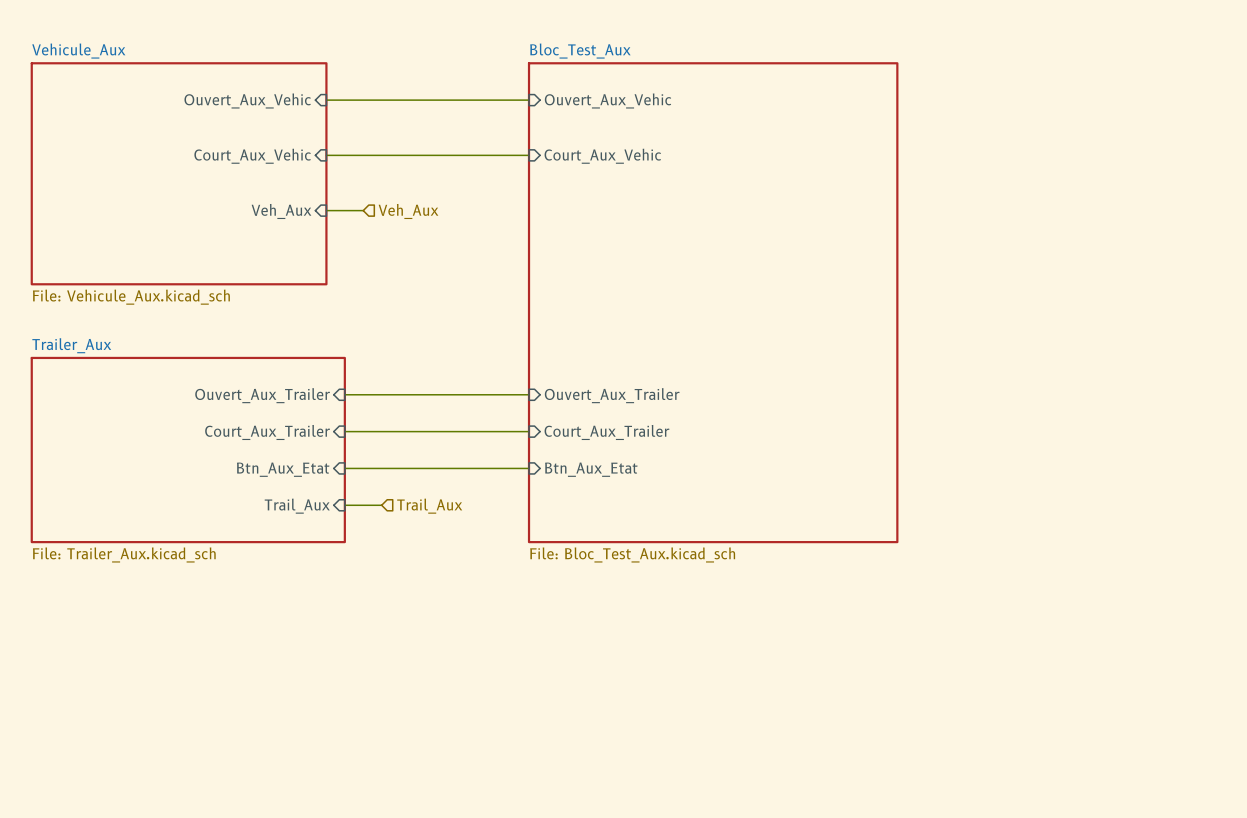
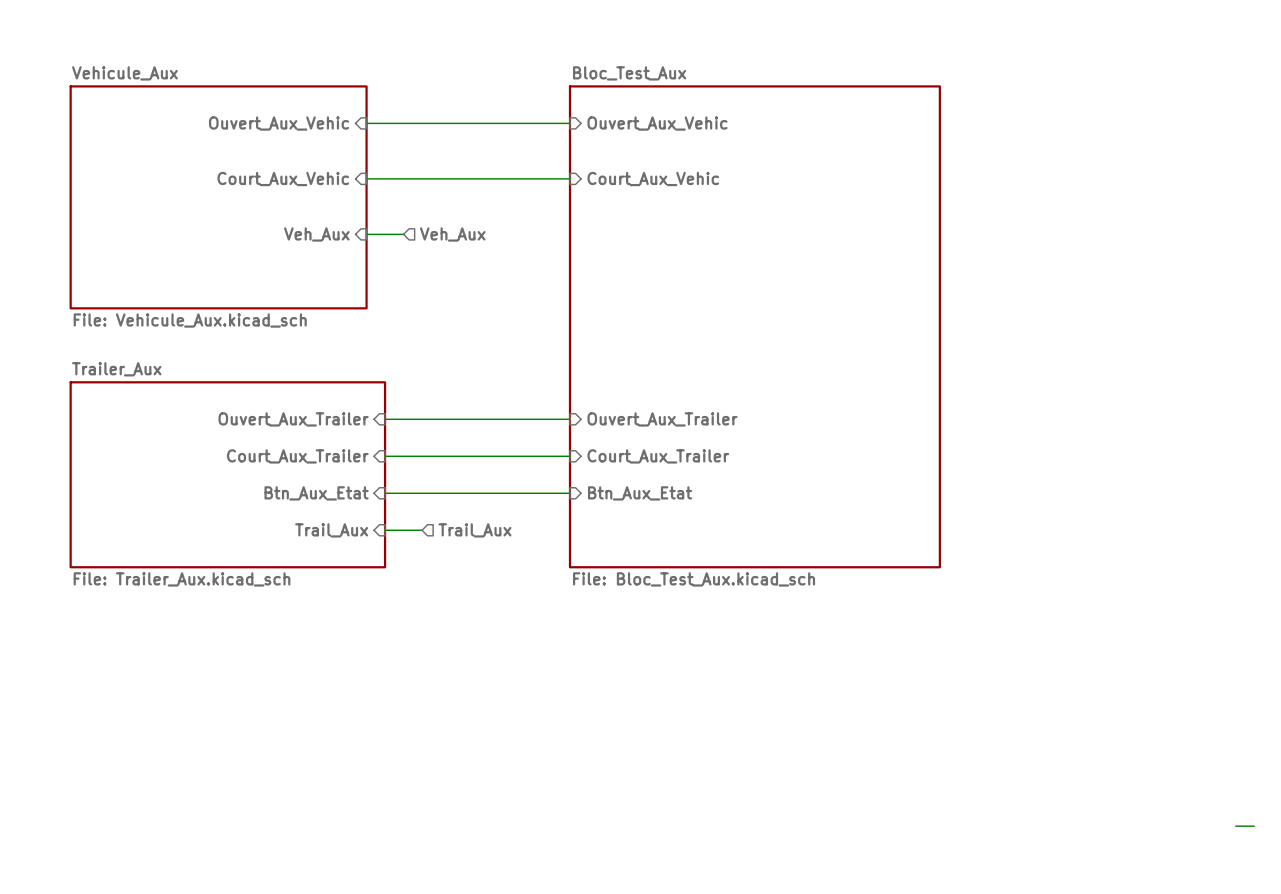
wire: none -> (1235, 826) (1254, 826)

